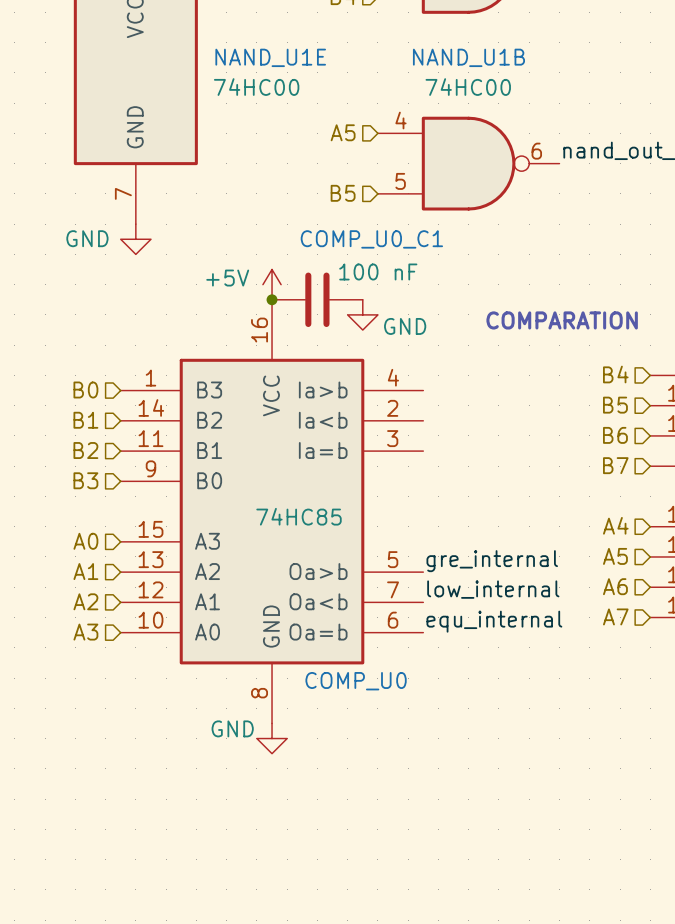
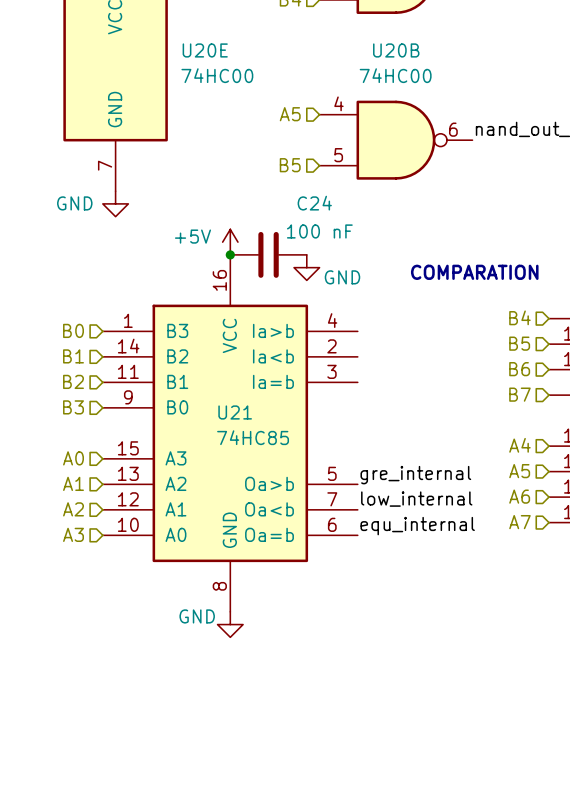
NAND_U1E name: NAND_U1E (270, 57) -> U20E (205, 50)
NAND_U1B name: NAND_U1B (468, 57) -> U20B (396, 50)
COMP_U0_C1 name: COMP_U0_C1 (371, 239) -> C24 (314, 203)
COMP_U0 name: COMP_U0 (356, 681) -> U21 (235, 412)

